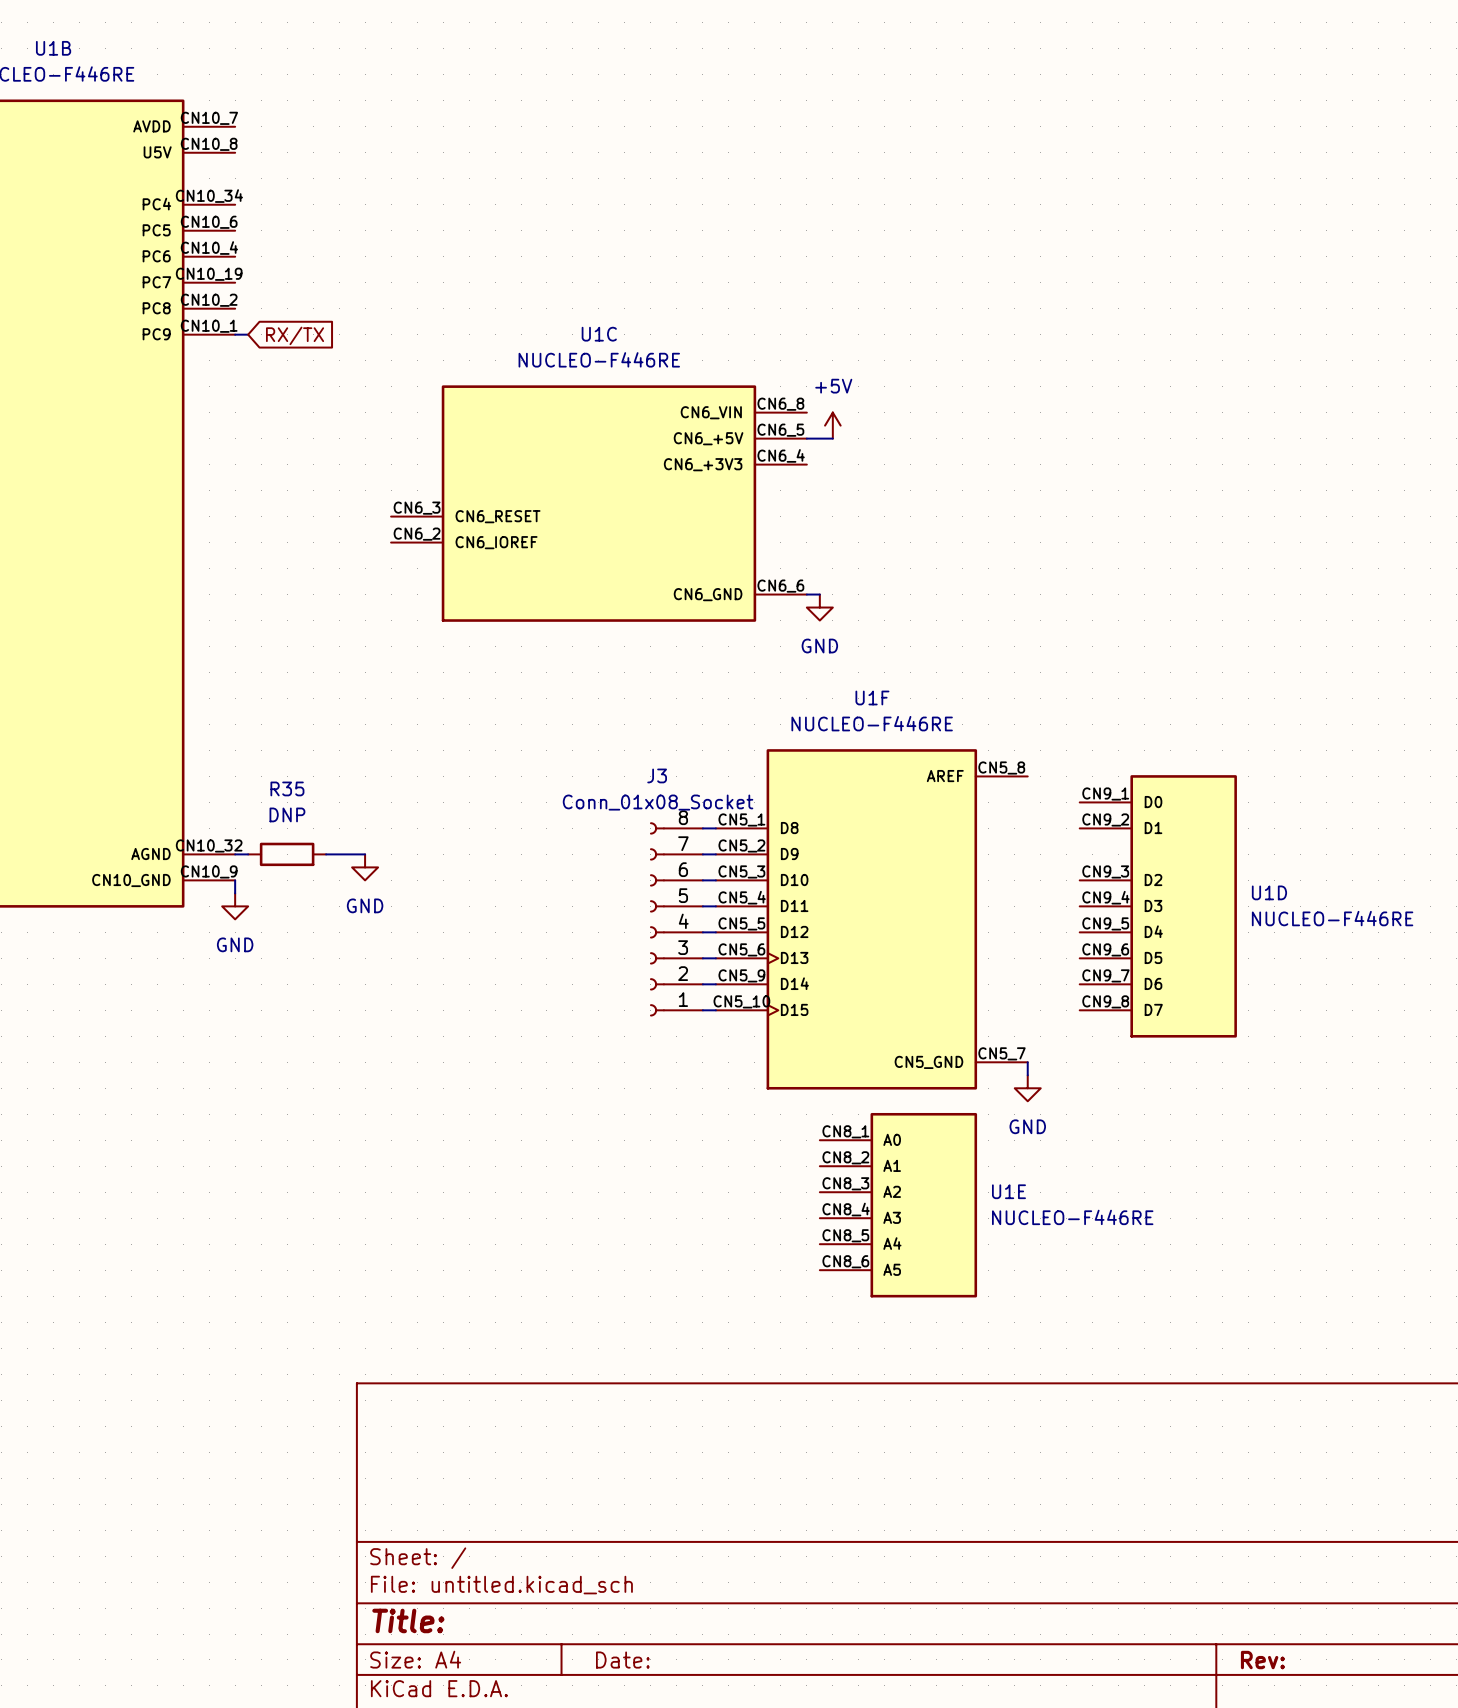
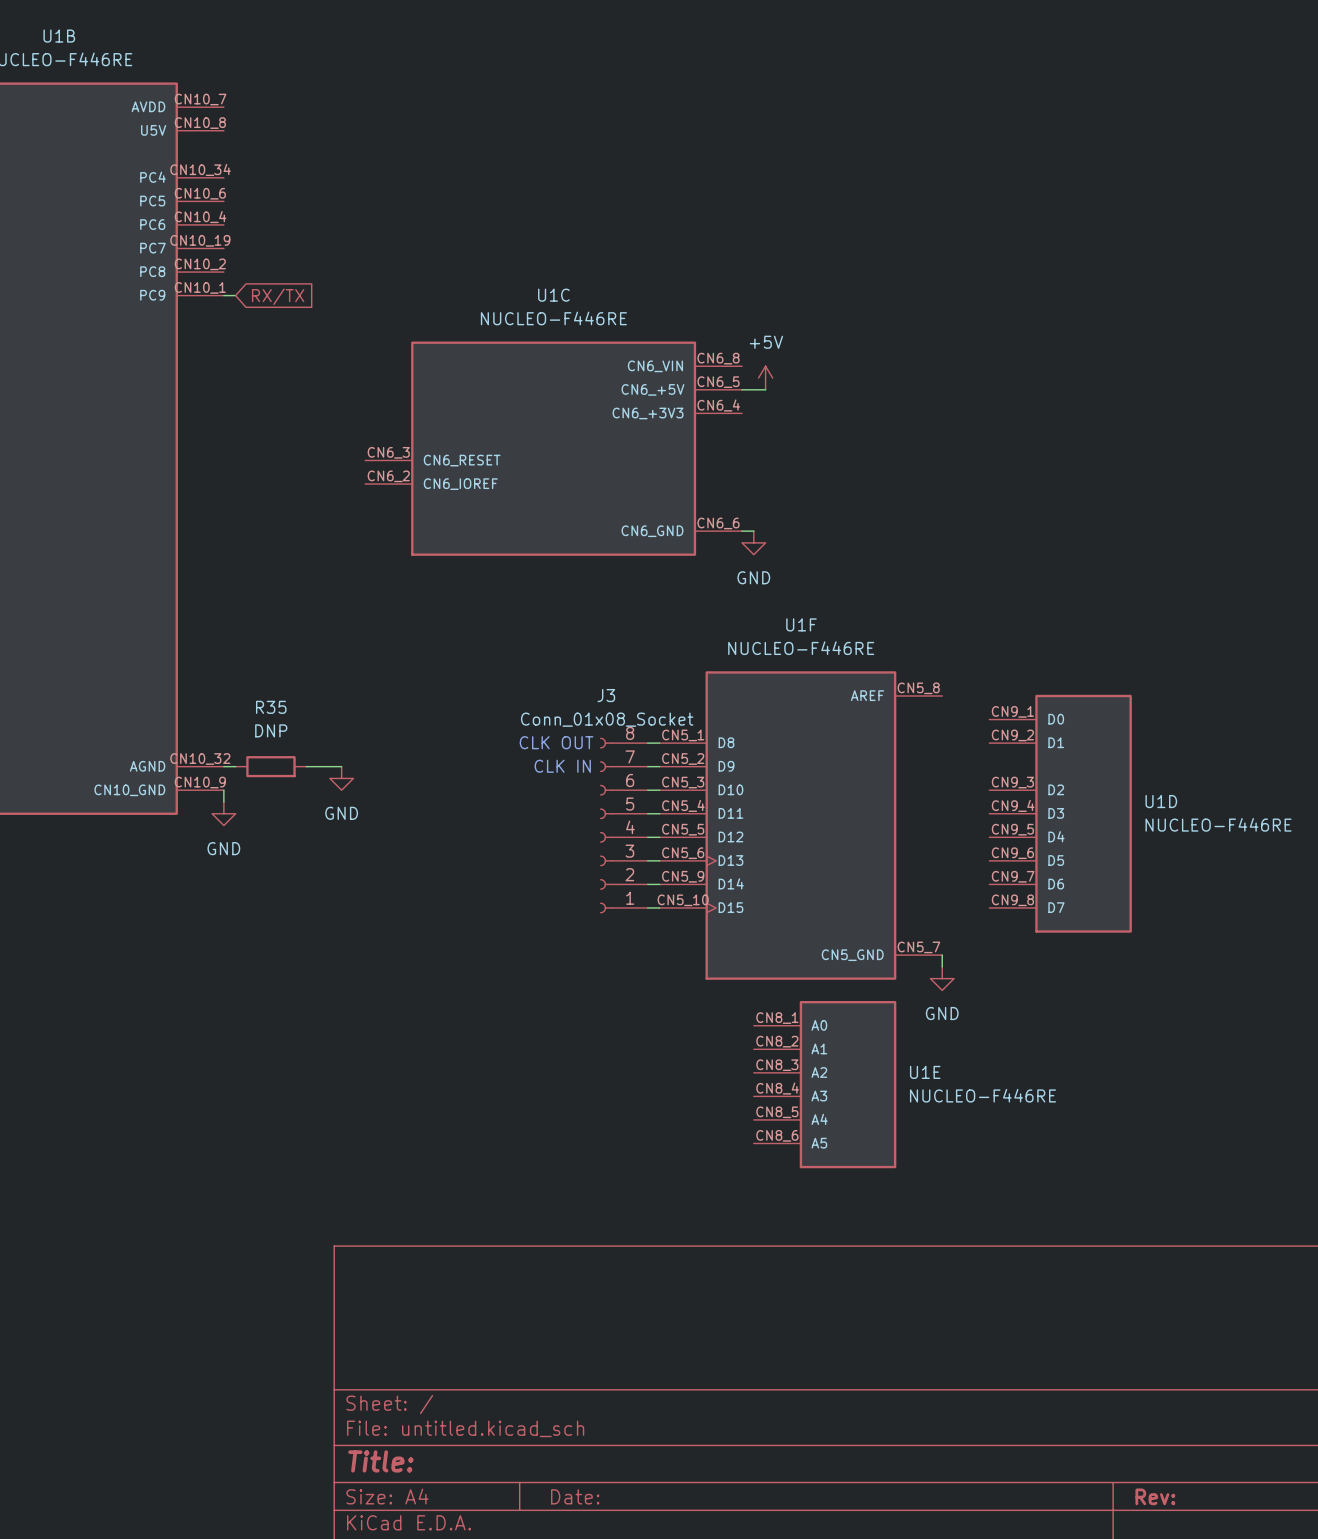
text: none -> CLK OUT (556, 742)
text: none -> CLK IN (562, 766)

